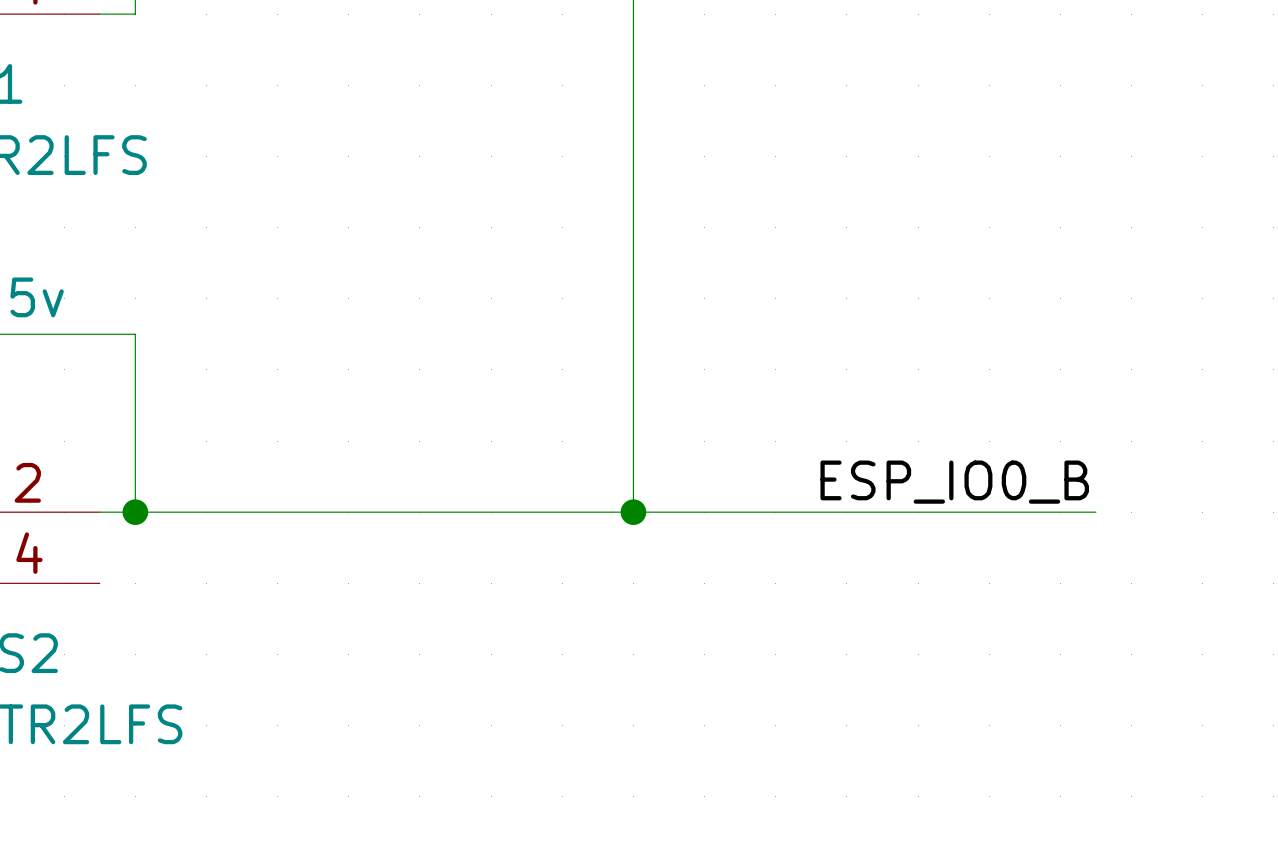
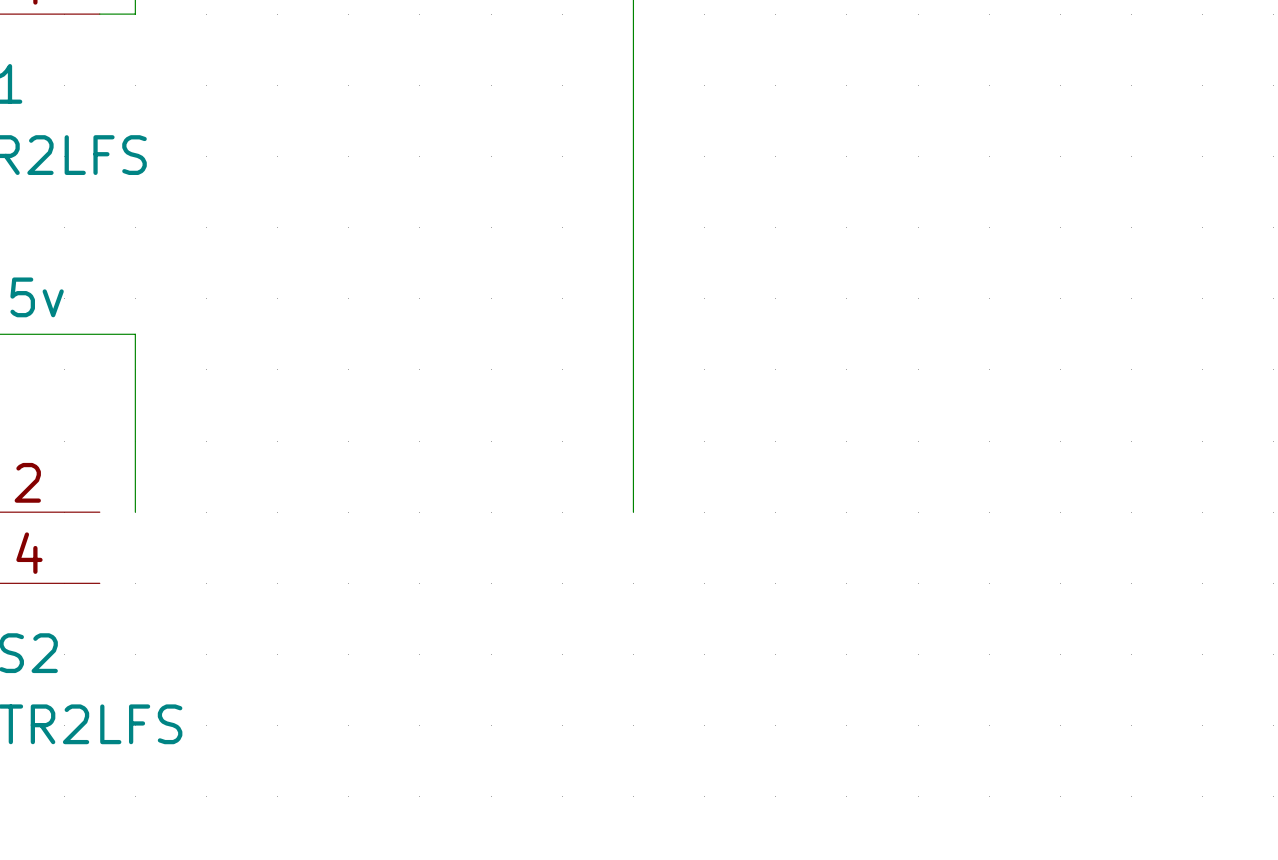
label: ESP_IO0_B (954, 482) -> none
wire: (99, 512) (1095, 512) -> none
junction: (135, 512) -> none
junction: (633, 512) -> none

